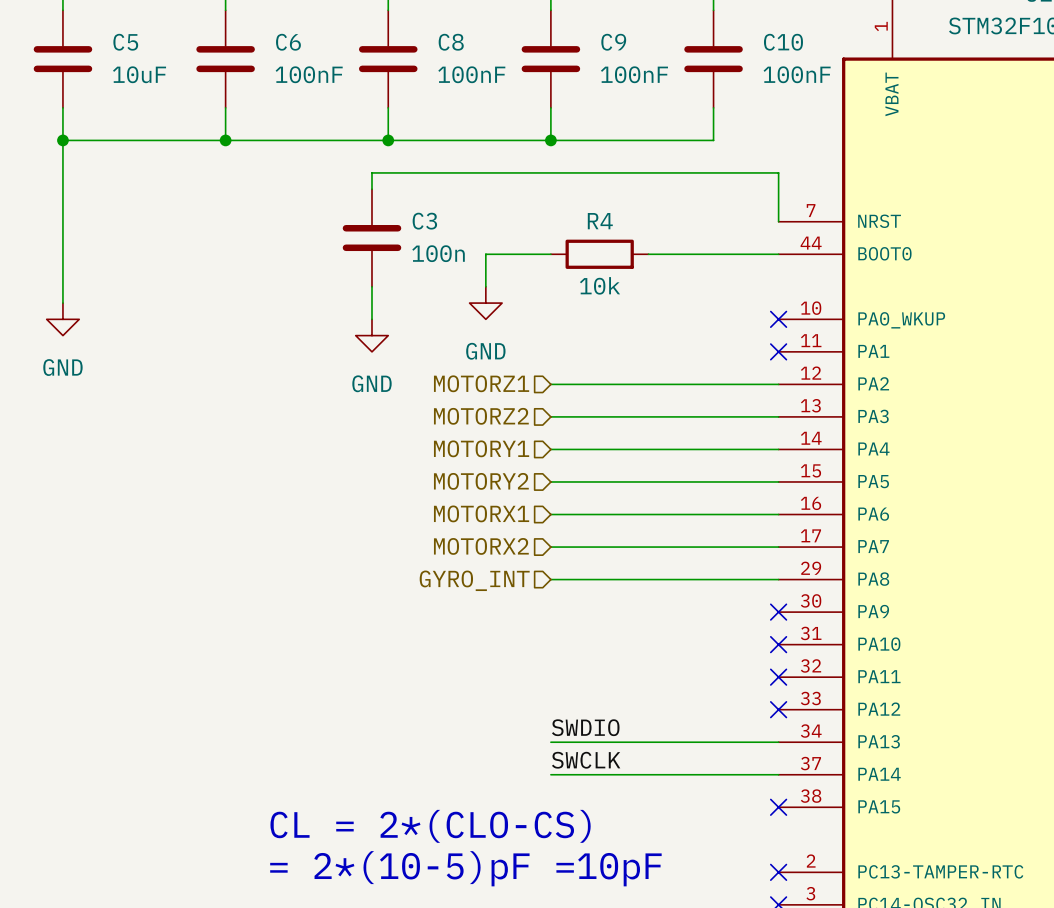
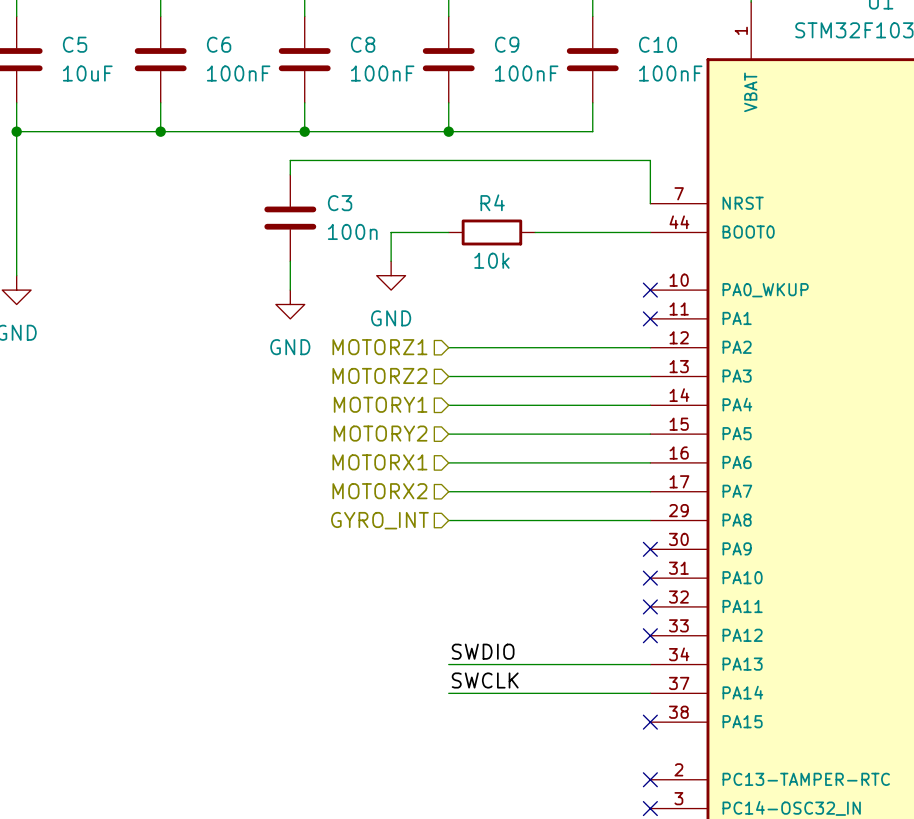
text: CL = 2*(CLO-CS) (430, 826) -> none
text: = 2*(10-5)pF =10pF (465, 868) -> none

